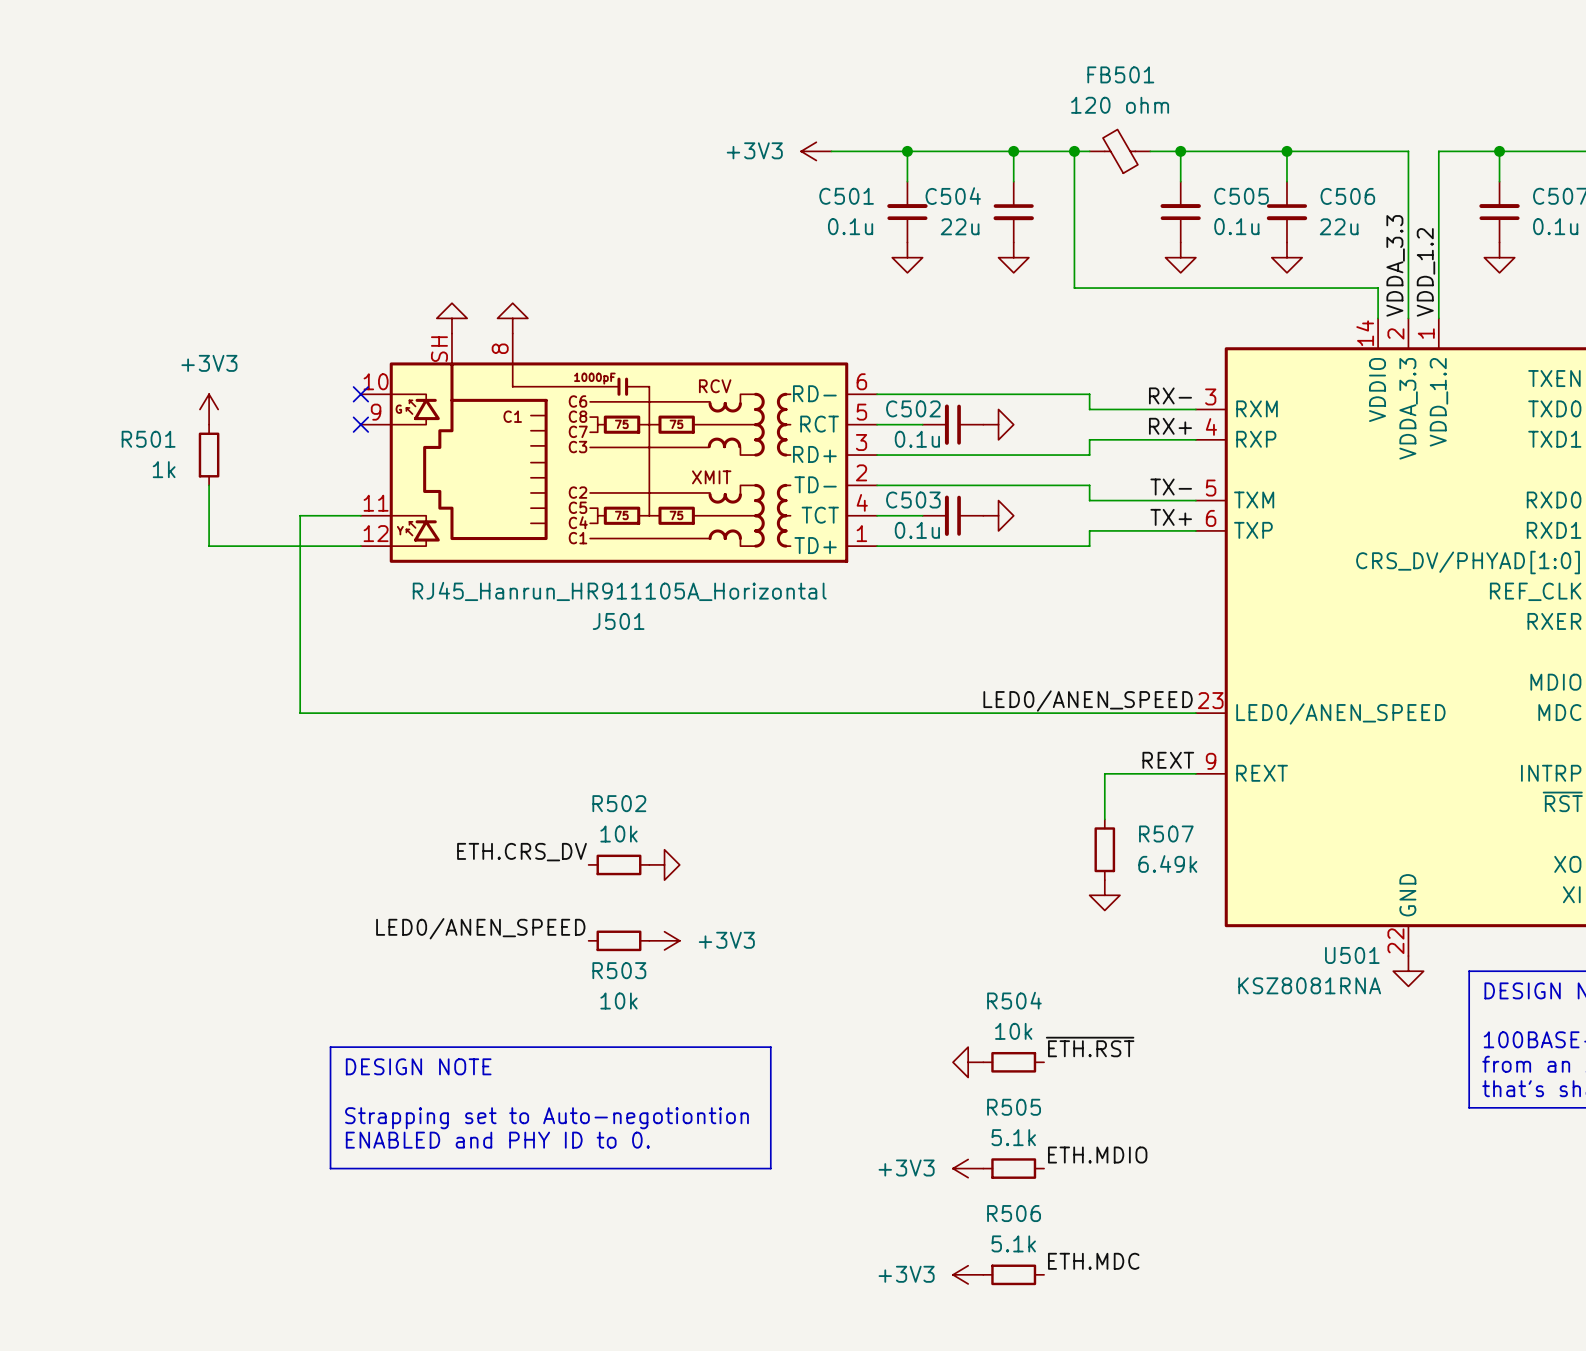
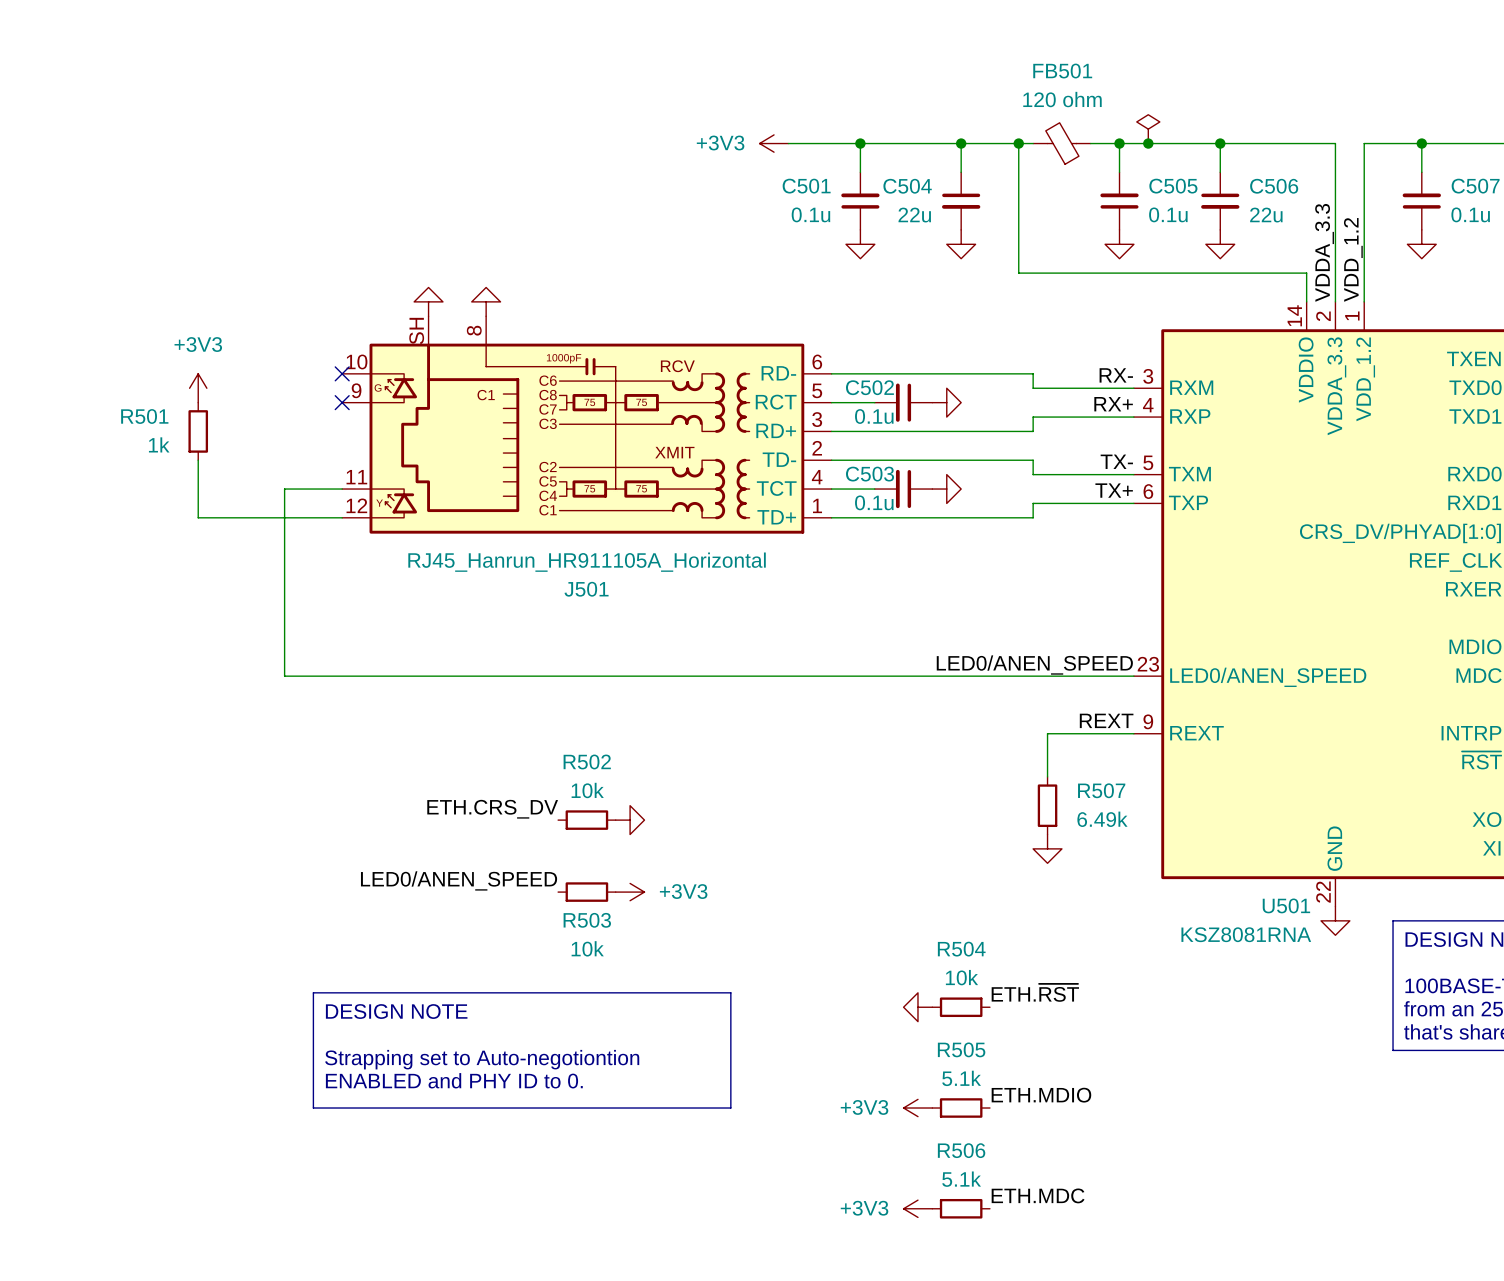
power symbol: none -> (1148, 129)
junction: none -> (1148, 143)
label: ~{ETH.RST} (1090, 1047) -> ETH.~{RST} (1035, 992)

